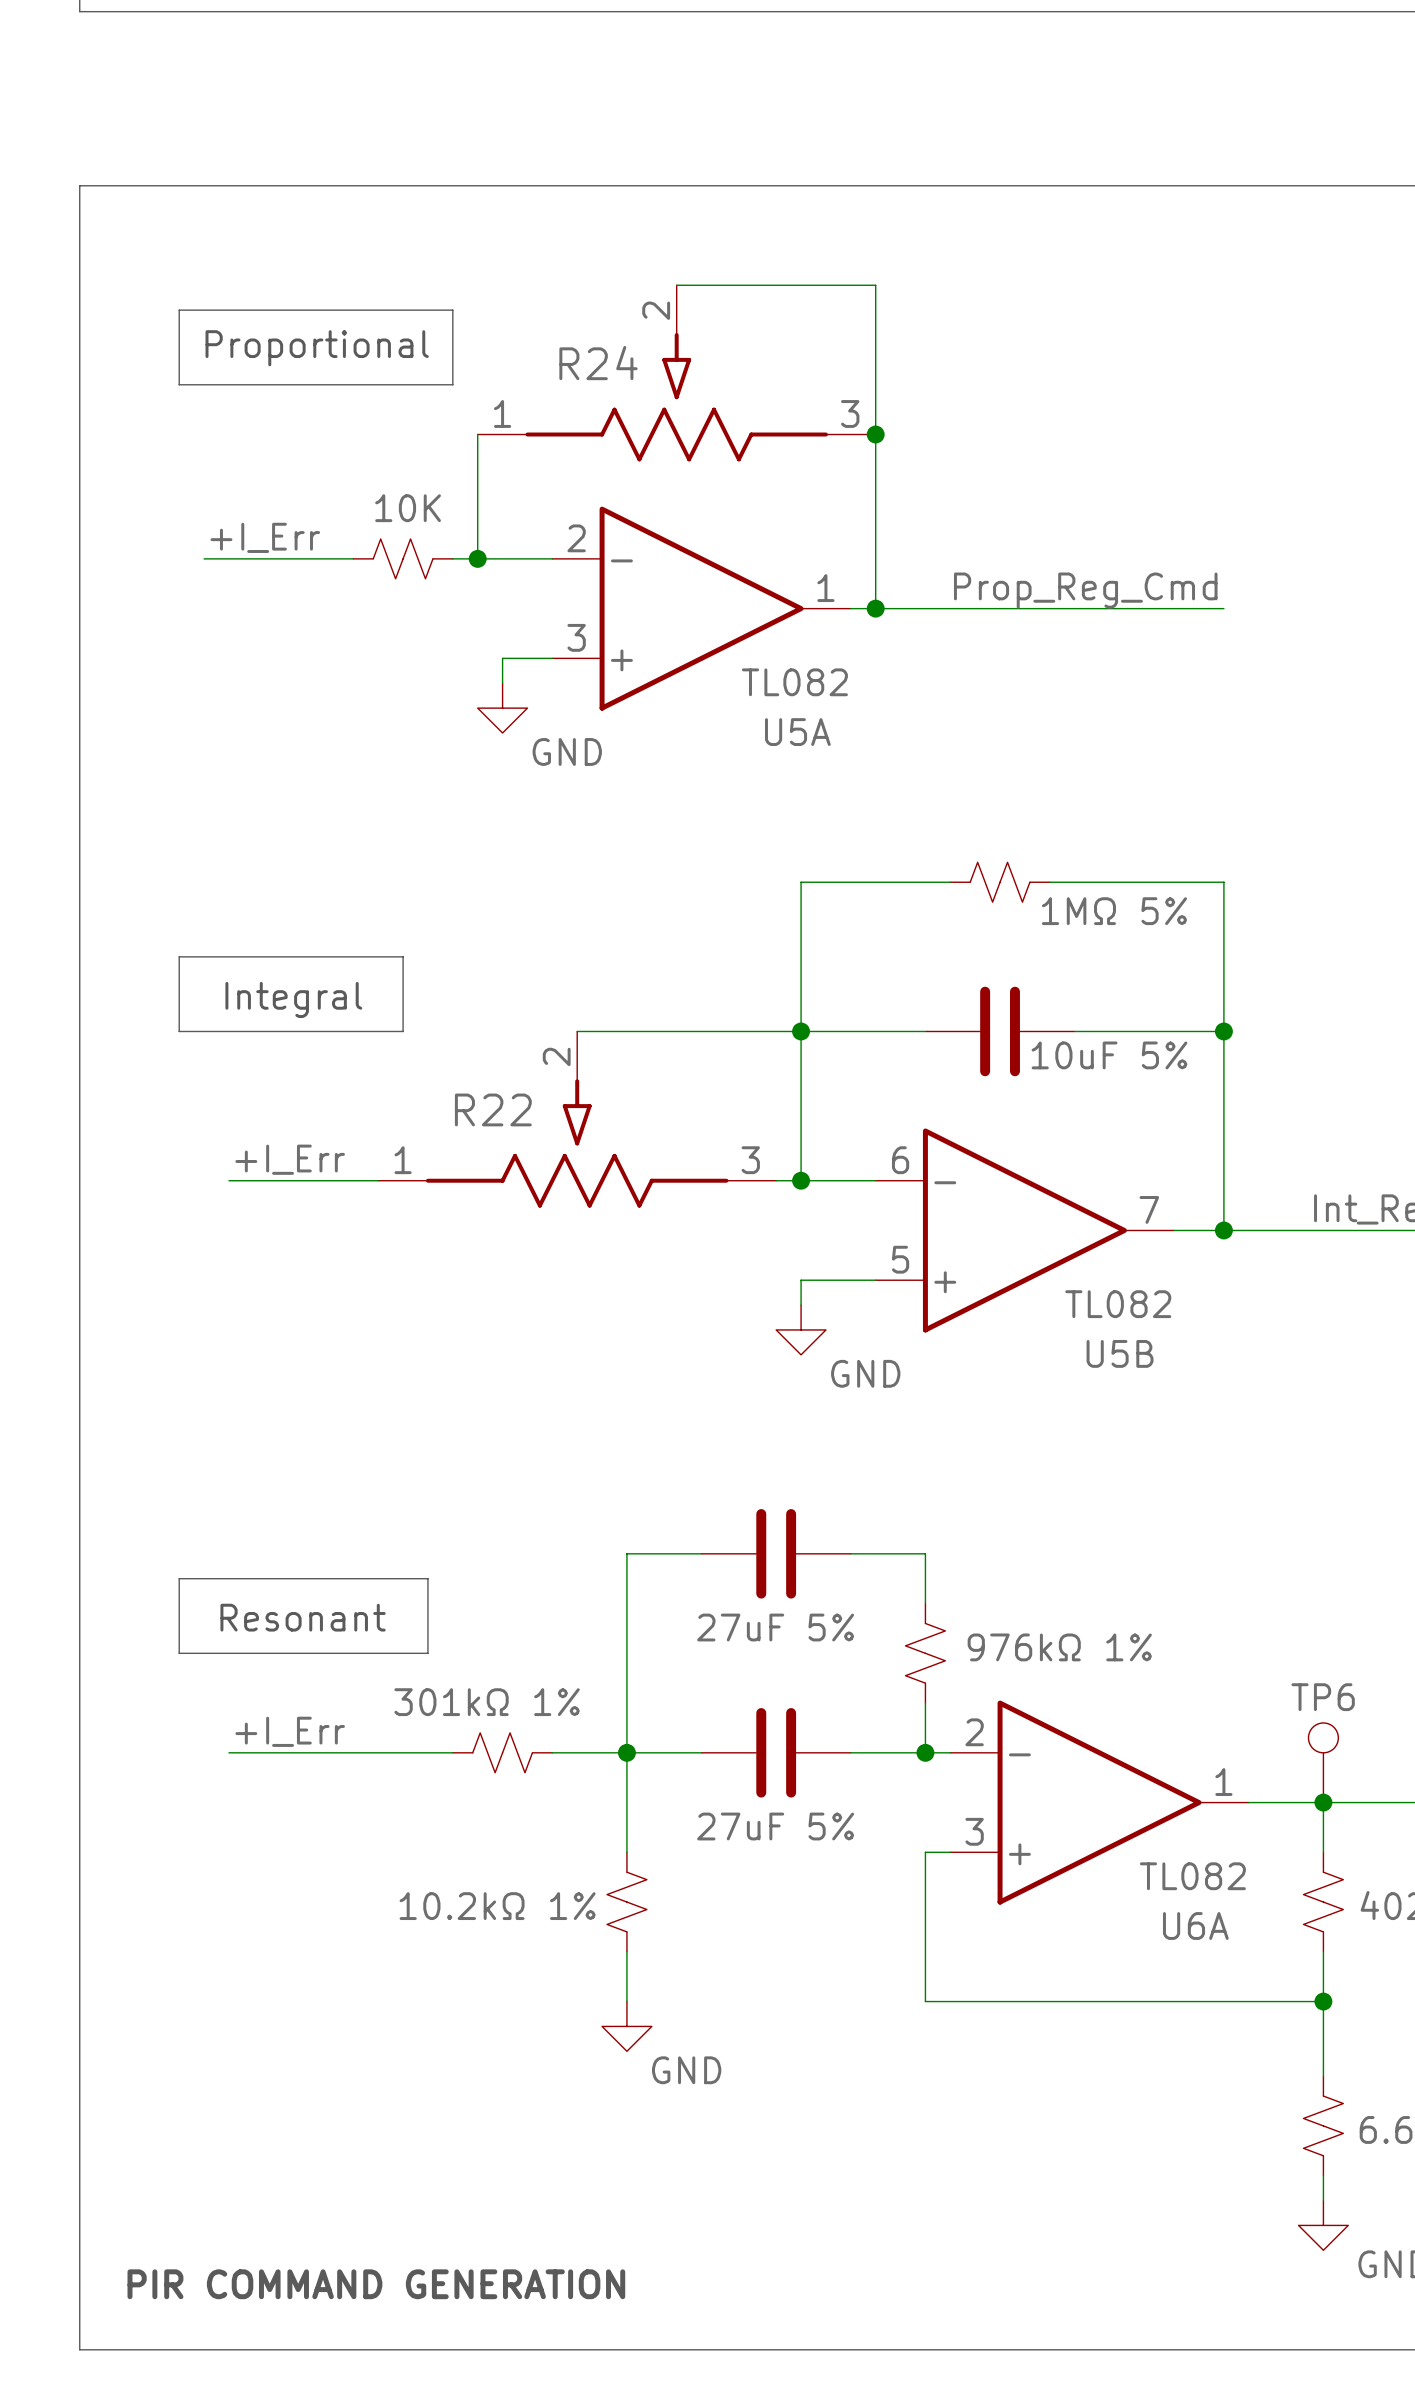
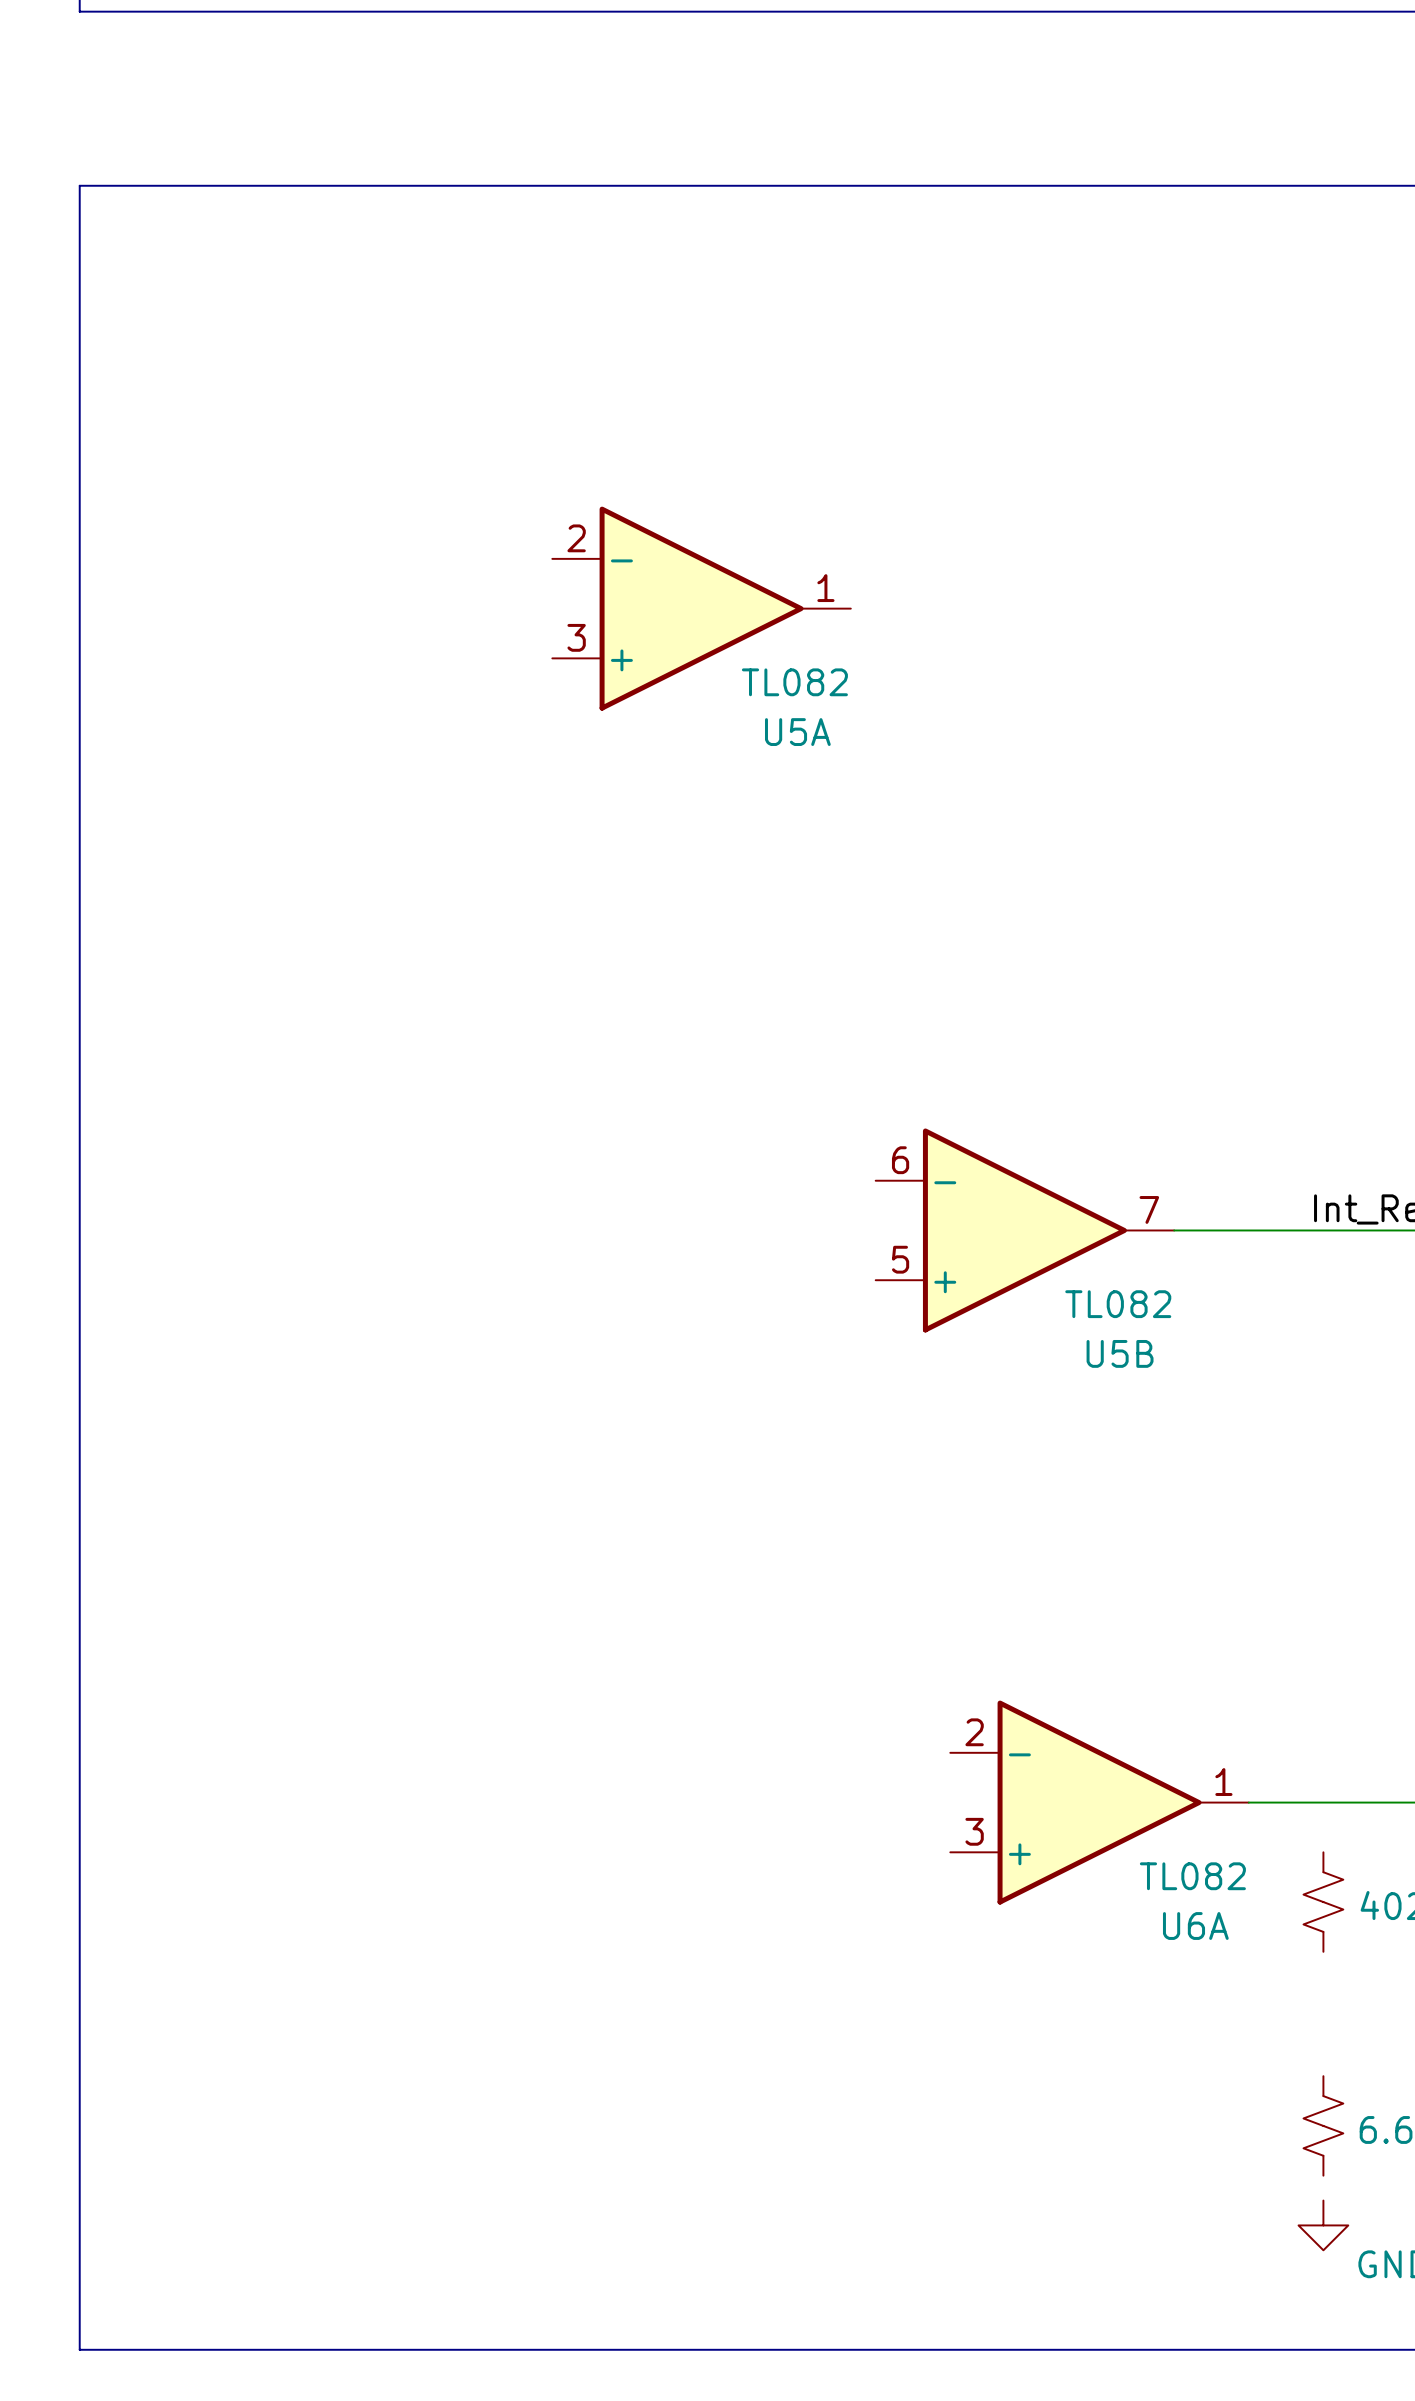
wire: (676, 285) (875, 285) (875, 608) -> none
line: (179, 310) (179, 384) (452, 384) (452, 310) (179, 310) -> none
text: Proportional (317, 348) -> none
R24: (676, 373) -> none
wire: (477, 434) (477, 558) -> none
junction: (875, 434) -> none
label: +I_Err (265, 537) -> none
wire: (204, 558) (353, 558) -> none
part: 10K (403, 558) -> none
wire: (452, 558) (552, 558) -> none
junction: (477, 558) -> none
label: Prop_Reg_Cmd (1085, 590) -> none
wire: (850, 608) (1223, 608) -> none
junction: (875, 608) -> none
wire: (552, 658) (502, 658) (502, 683) -> none
power symbol: GND (502, 708) -> none
wire: (950, 882) (801, 882) (801, 1180) -> none
part: 1MΩ 5% (1000, 882) -> none
wire: (1049, 882) (1223, 882) (1223, 1230) -> none
line: (179, 956) (179, 1031) (403, 1031) (403, 956) (179, 956) -> none
text: Integral (293, 999) -> none
wire: (577, 1031) (925, 1031) -> none
junction: (801, 1031) -> none
part: 10uF 5% (1000, 1031) -> none
wire: (1074, 1031) (1223, 1031) -> none
junction: (1223, 1031) -> none
R22: (577, 1119) -> none
label: +I_Err (290, 1159) -> none
wire: (228, 1180) (378, 1180) -> none
wire: (776, 1180) (875, 1180) -> none
junction: (801, 1180) -> none
junction: (1223, 1230) -> none
wire: (875, 1280) (801, 1280) (801, 1305) -> none
power symbol: GND (801, 1329) -> none
wire: (701, 1553) (626, 1553) (626, 1852) -> none
part: 27uF 5% (776, 1553) -> none
wire: (850, 1553) (925, 1553) (925, 1603) -> none
line: (179, 1578) (427, 1578) (427, 1653) (179, 1653) (179, 1578) -> none
text: Resonant (303, 1617) -> none
part: 976kΩ 1% (925, 1653) -> none
wire: (925, 1703) (925, 1752) -> none
label: +I_Err (290, 1731) -> none
wire: (228, 1752) (452, 1752) -> none
part: 301kΩ 1% (502, 1752) -> none
wire: (552, 1752) (701, 1752) -> none
junction: (626, 1752) -> none
part: 27uF 5% (776, 1752) -> none
wire: (850, 1752) (950, 1752) -> none
junction: (925, 1752) -> none
TP6: (1323, 1762) -> none
wire: (1323, 1802) (1323, 1852) -> none
junction: (1323, 1802) -> none
wire: (950, 1852) (925, 1852) (925, 2001) (1323, 2001) -> none
part: 10.2kΩ 1% (626, 1902) -> none
wire: (626, 1951) (626, 2001) -> none
wire: (1323, 1951) (1323, 2076) -> none
junction: (1323, 2001) -> none
power symbol: GND (626, 2026) -> none
wire: (1323, 2175) (1323, 2200) -> none
text: PIR COMMAND GENERATION (376, 2284) -> none

